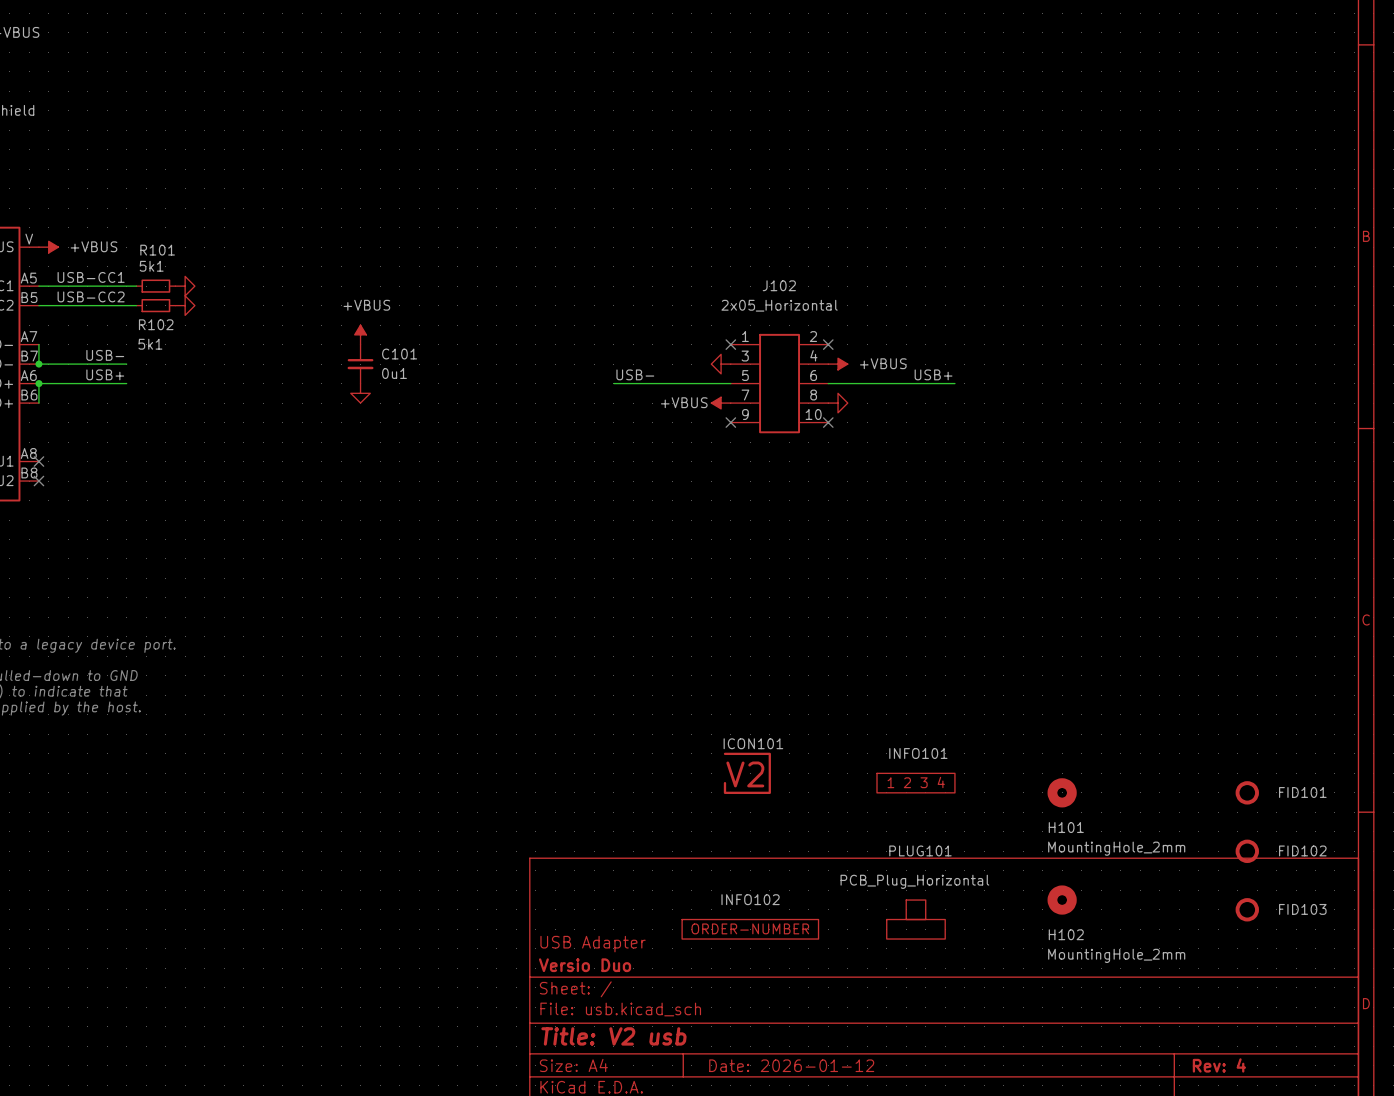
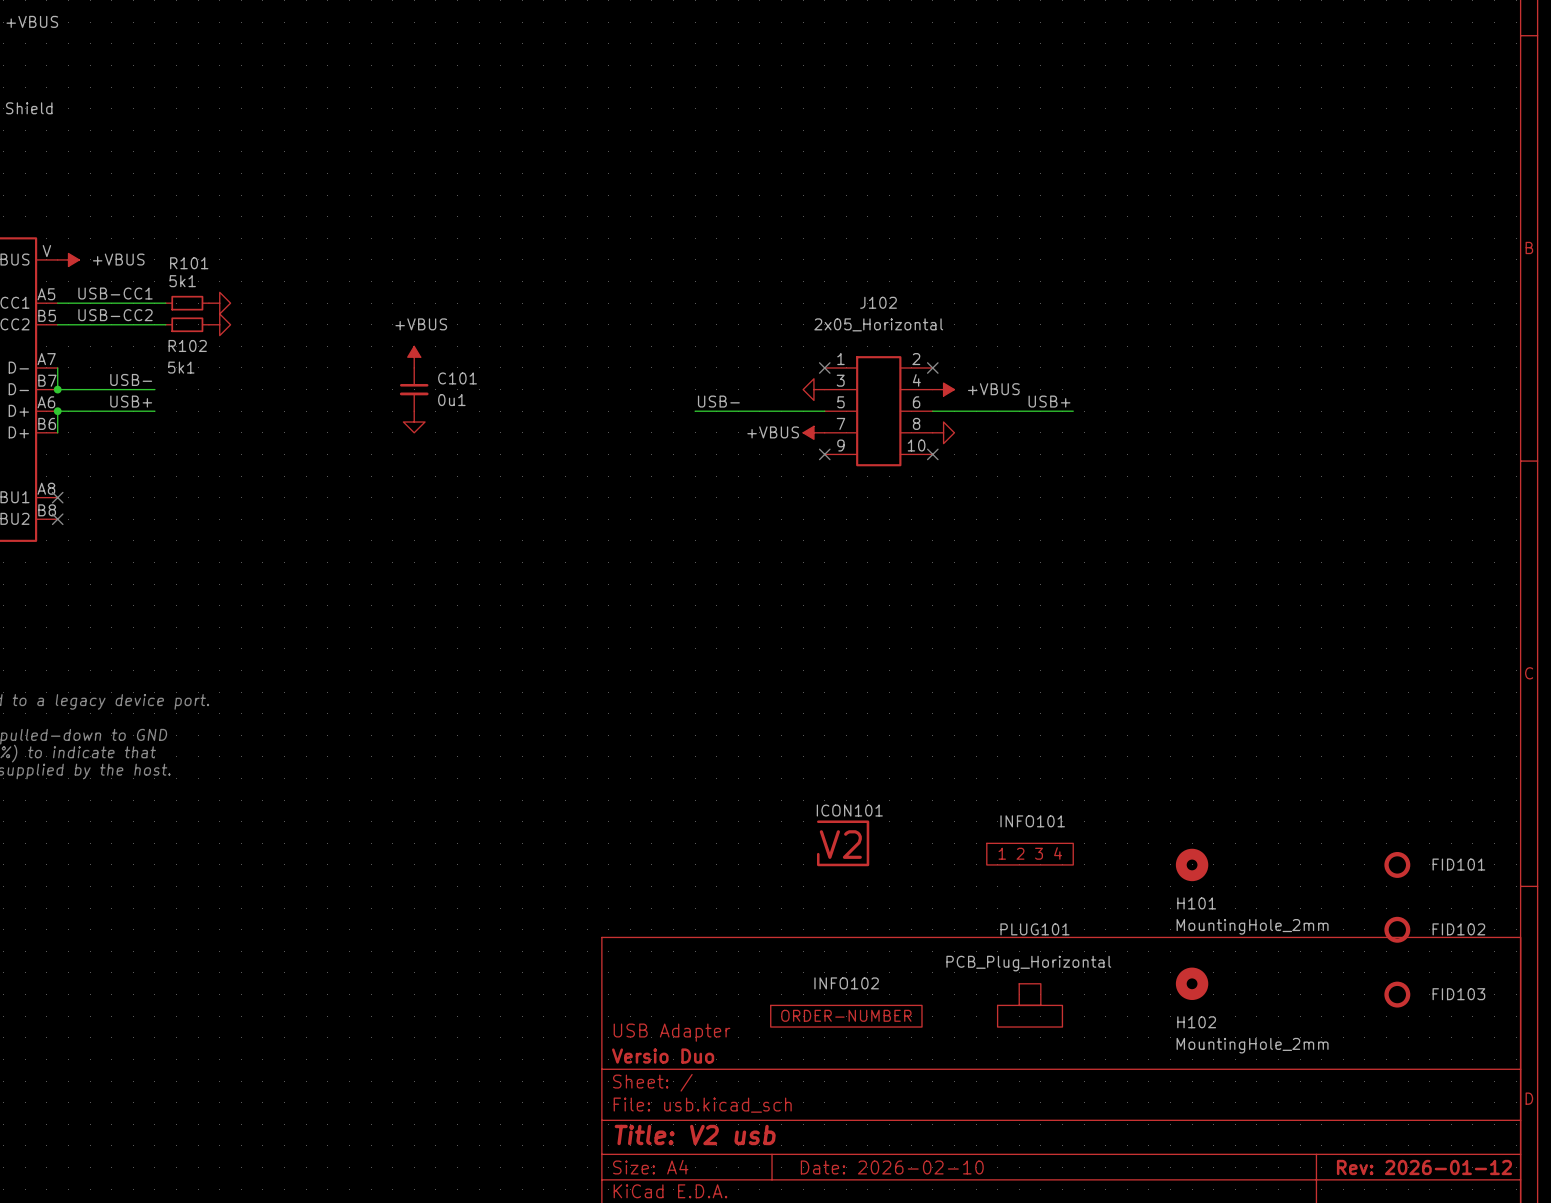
title block: Date: 2026-01-12 (791, 1065) -> Date: 2026-02-10 (892, 1167)
title block: Rev: 4 (1219, 1065) -> Rev: 2026-01-12 (1424, 1167)

